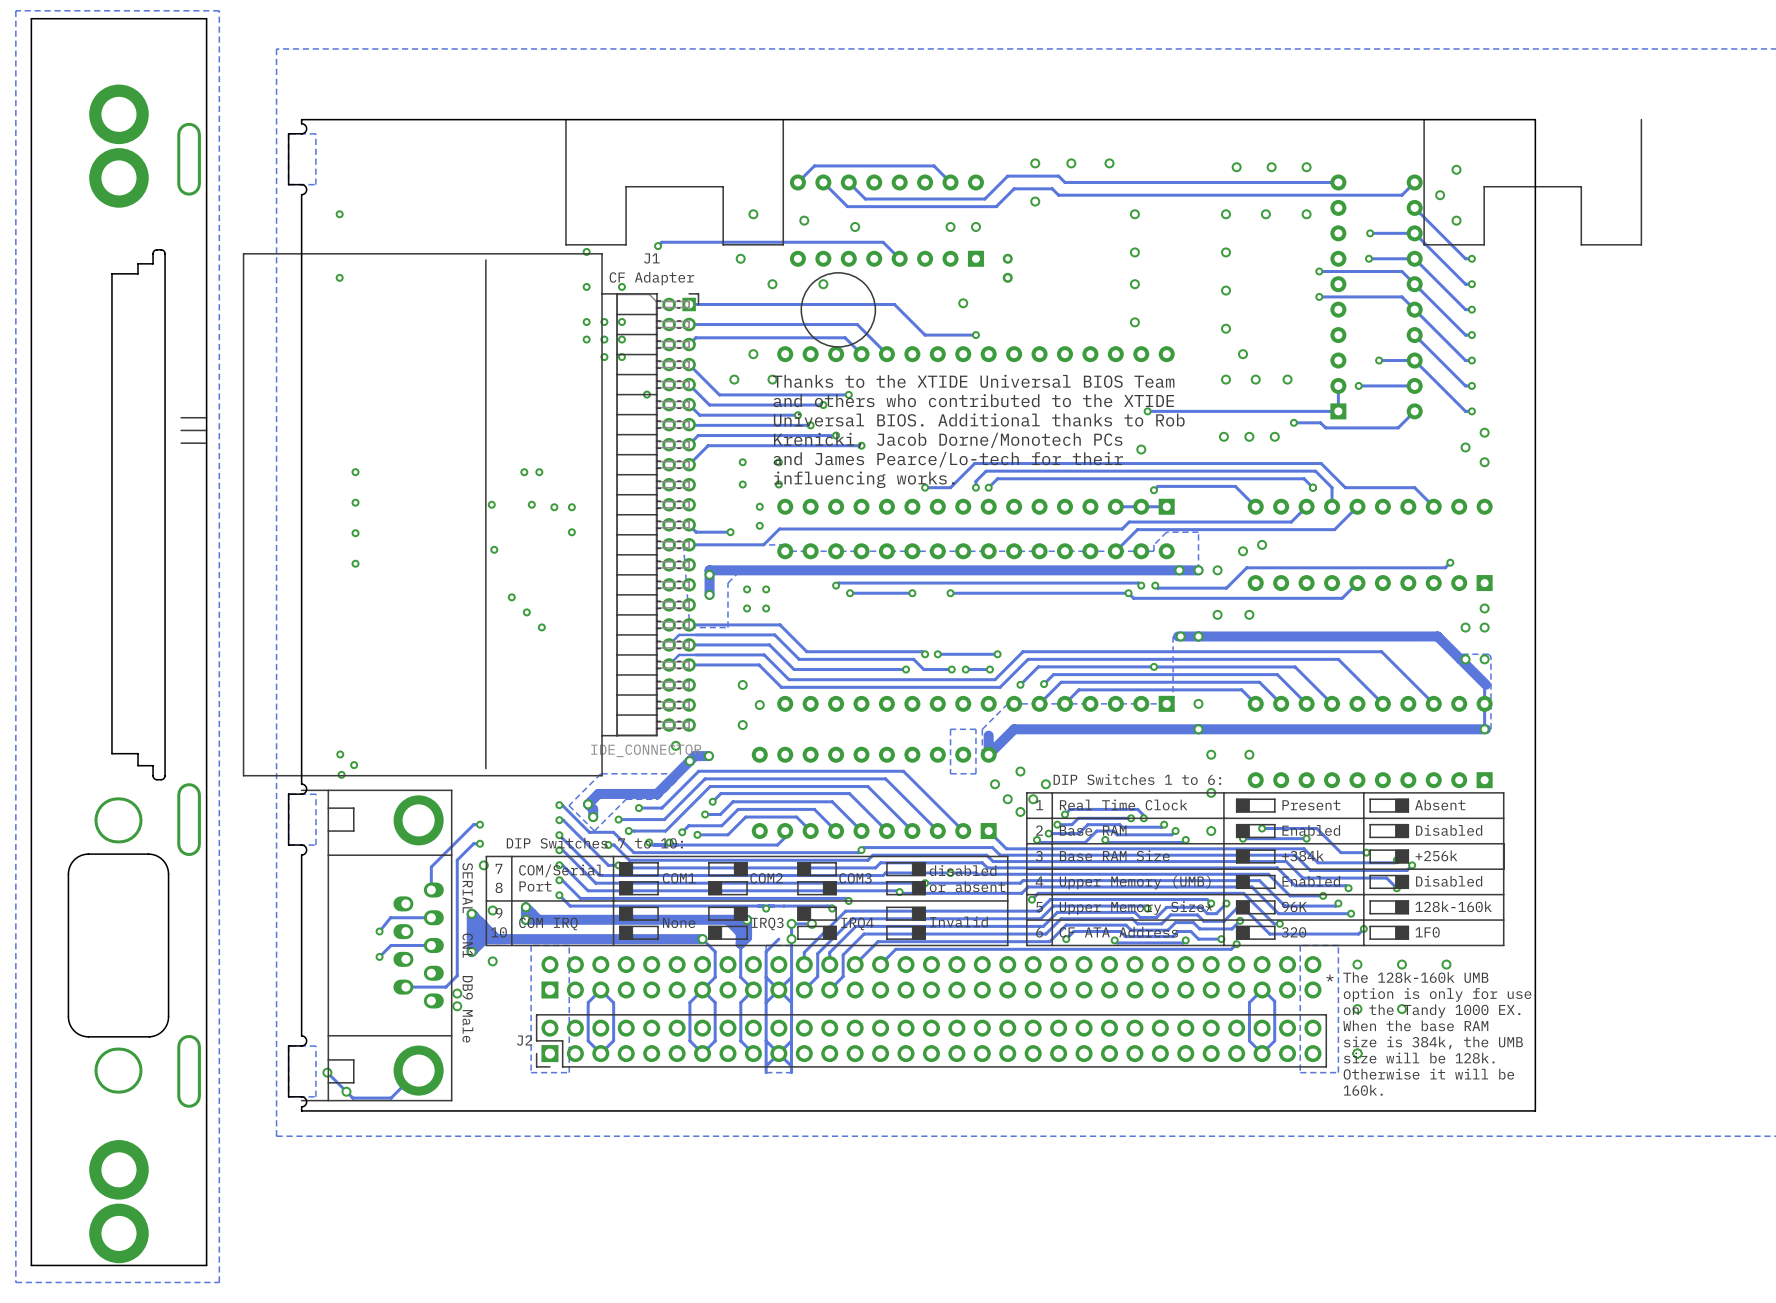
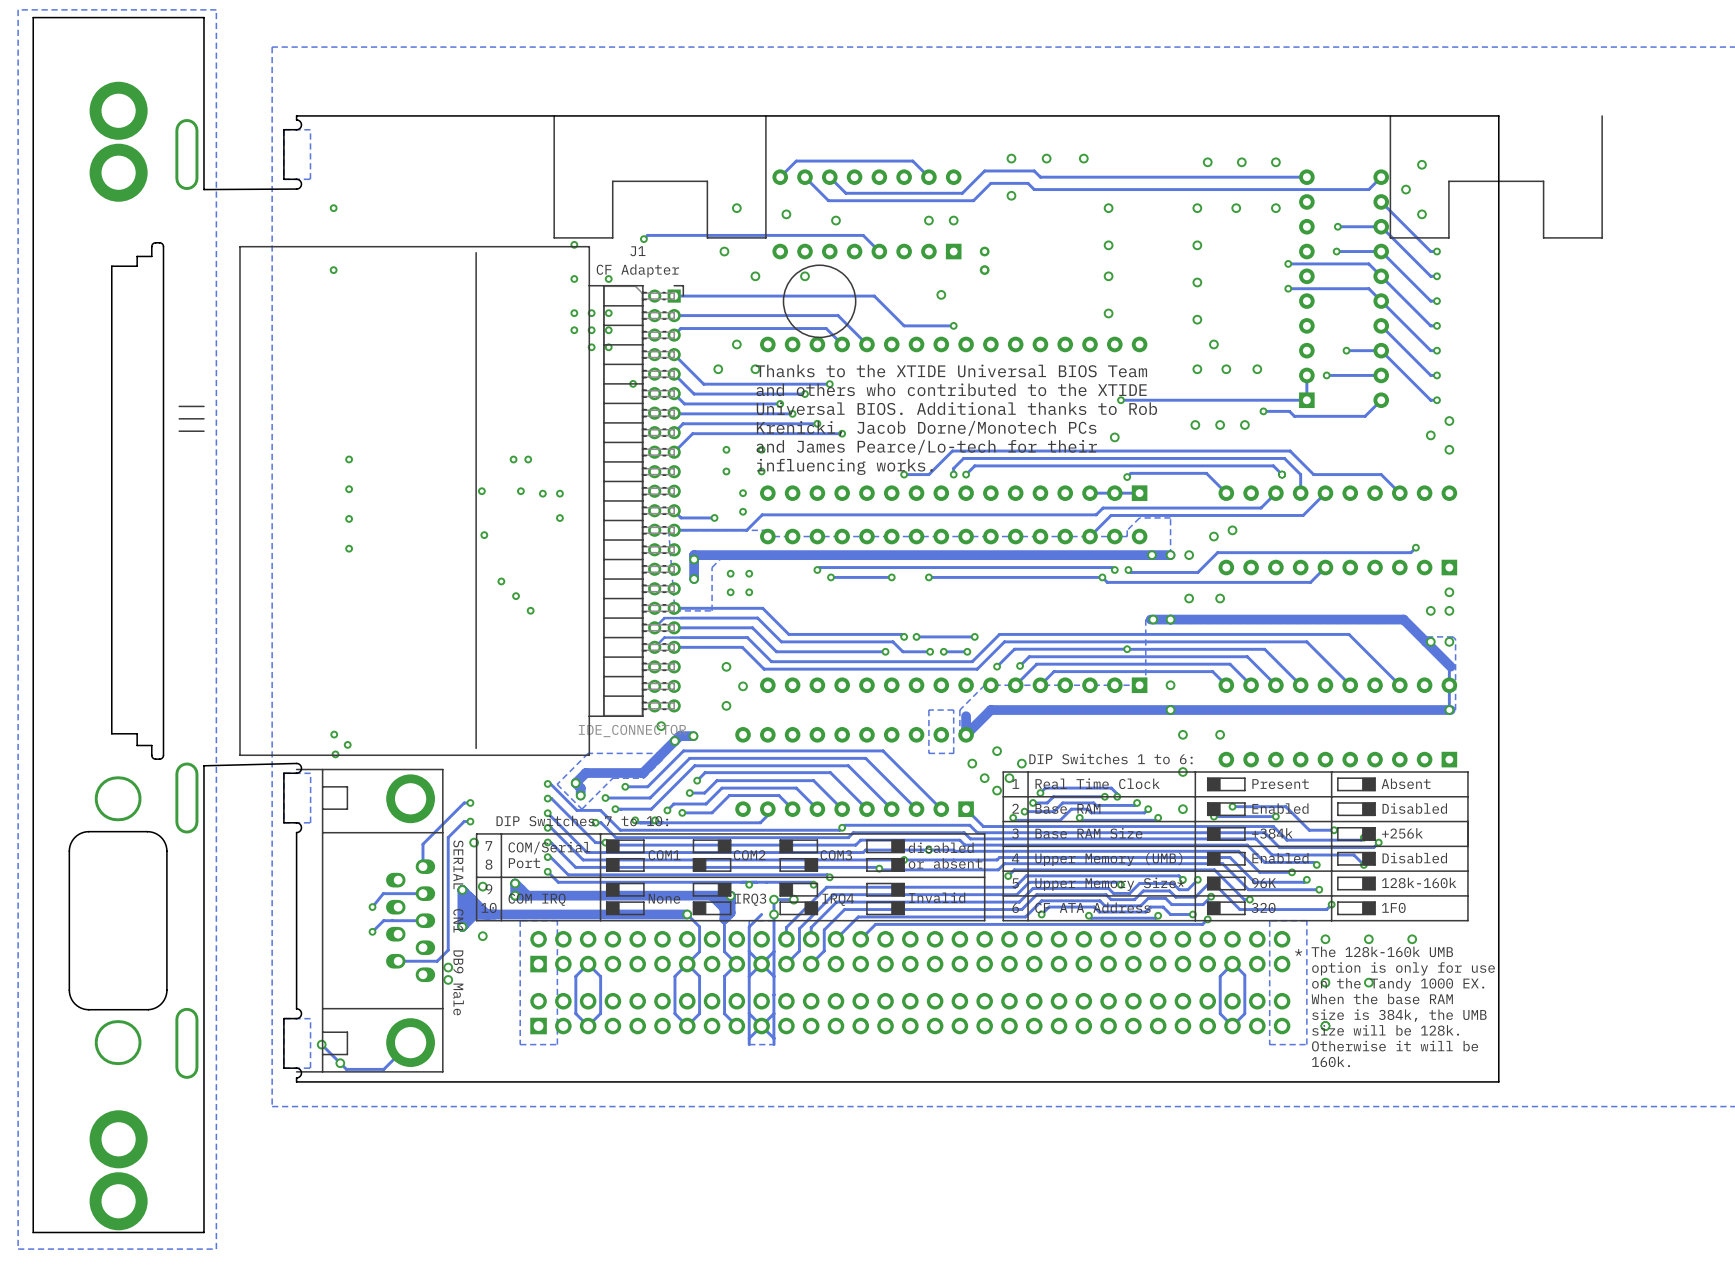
board edge: (301, 194) (301, 784) -> (296, 189) (203, 189)
board edge: (206, 195) (206, 786) -> (296, 763) (203, 765)
J2: (931, 1040) -> none

